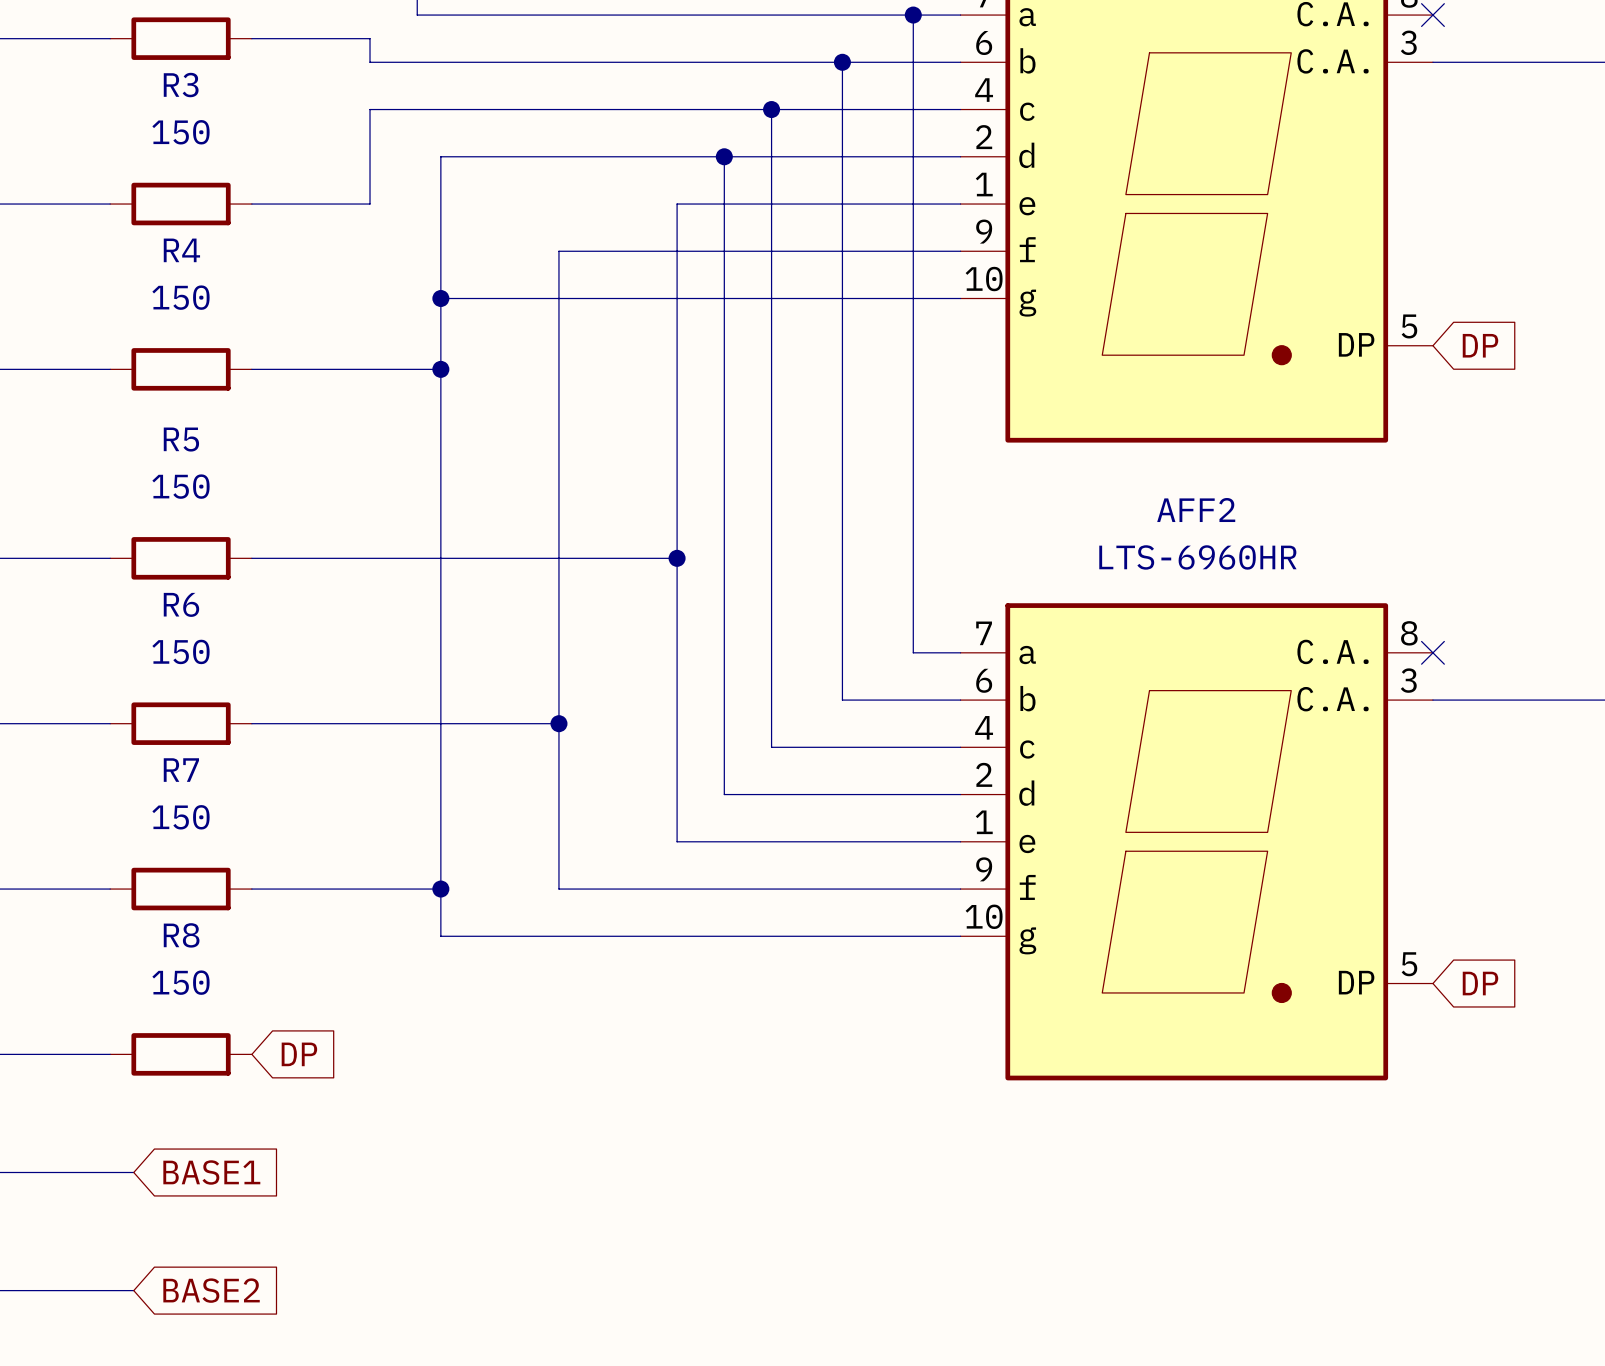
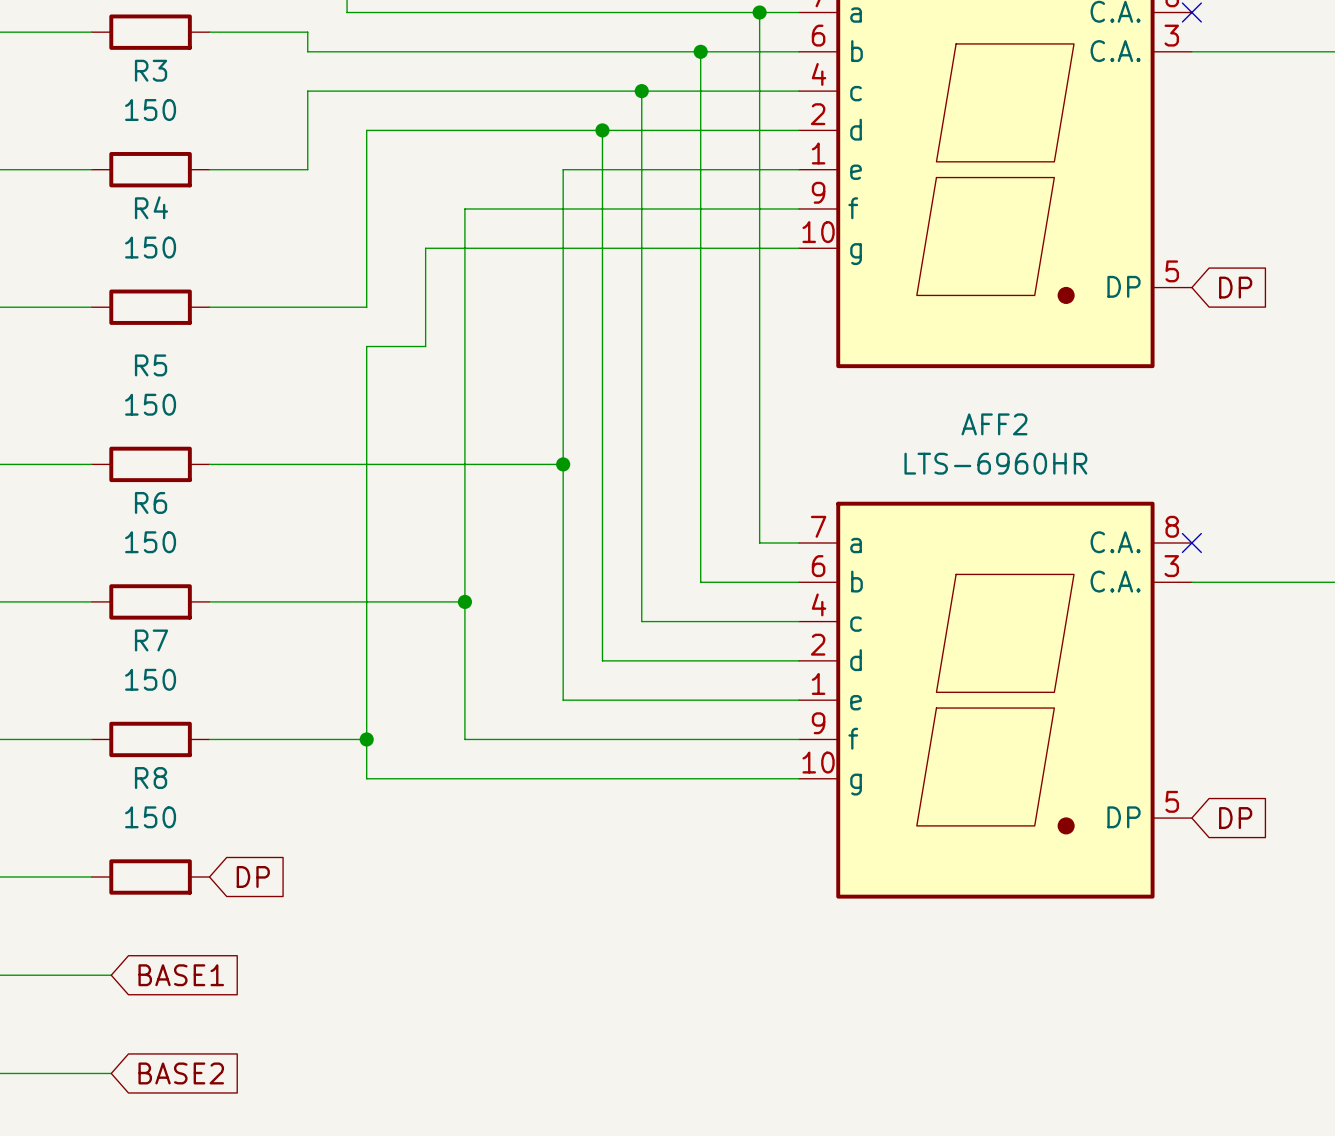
wire: (440, 298) (511, 298) -> none
junction: (440, 298) -> none
wire: (440, 369) (440, 416) -> (425, 248) (425, 346) (366, 346)
junction: (440, 369) -> none

